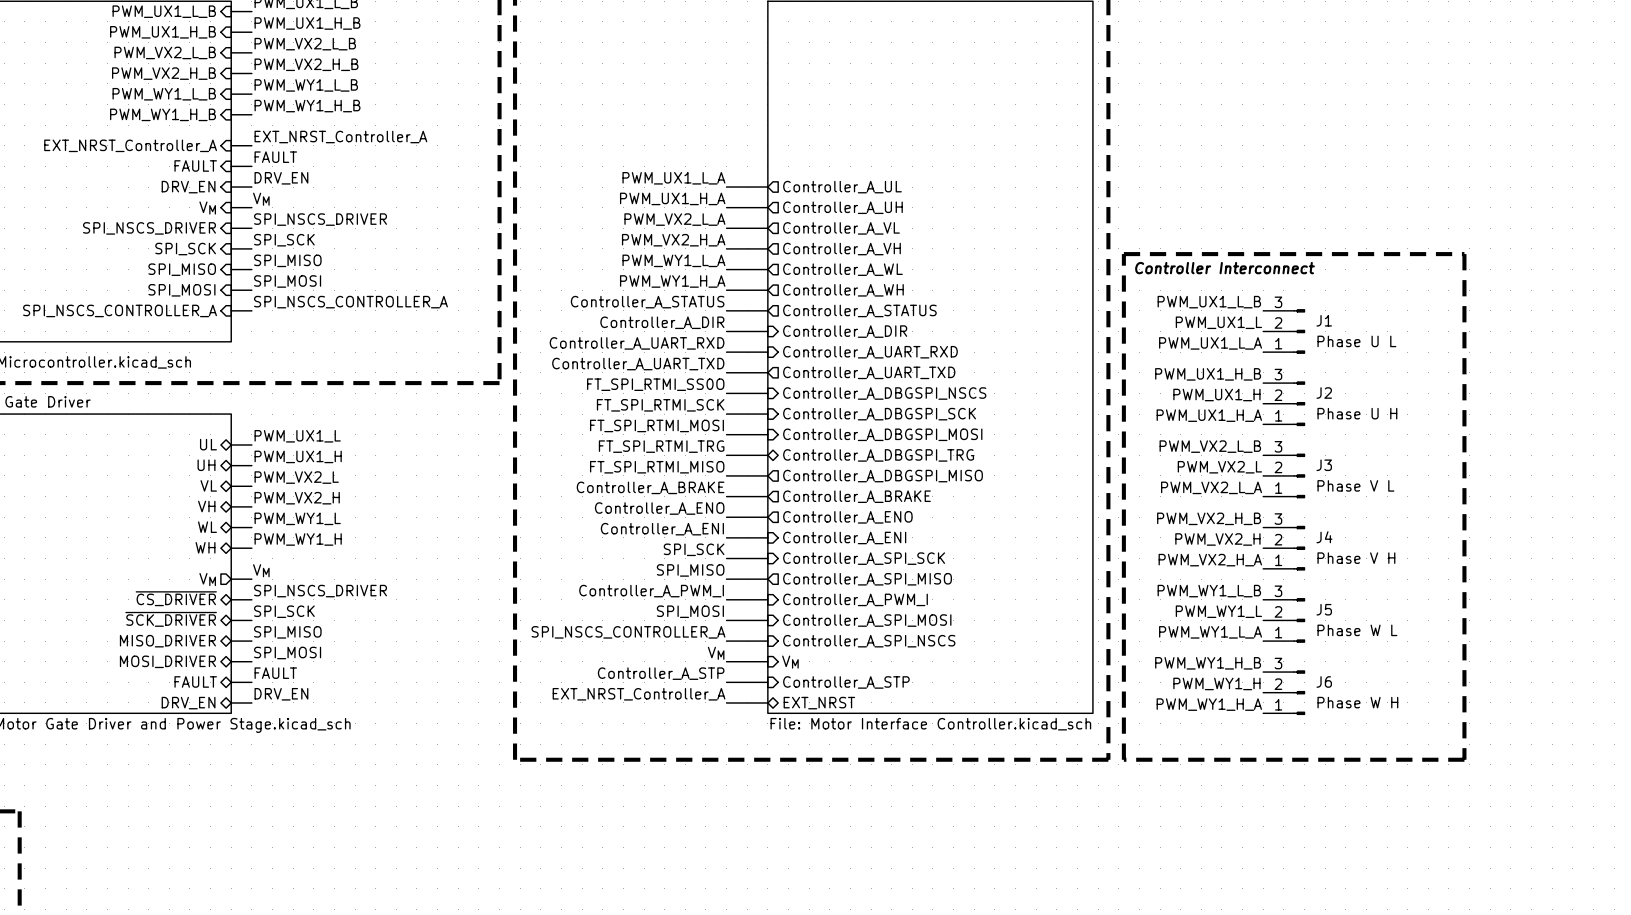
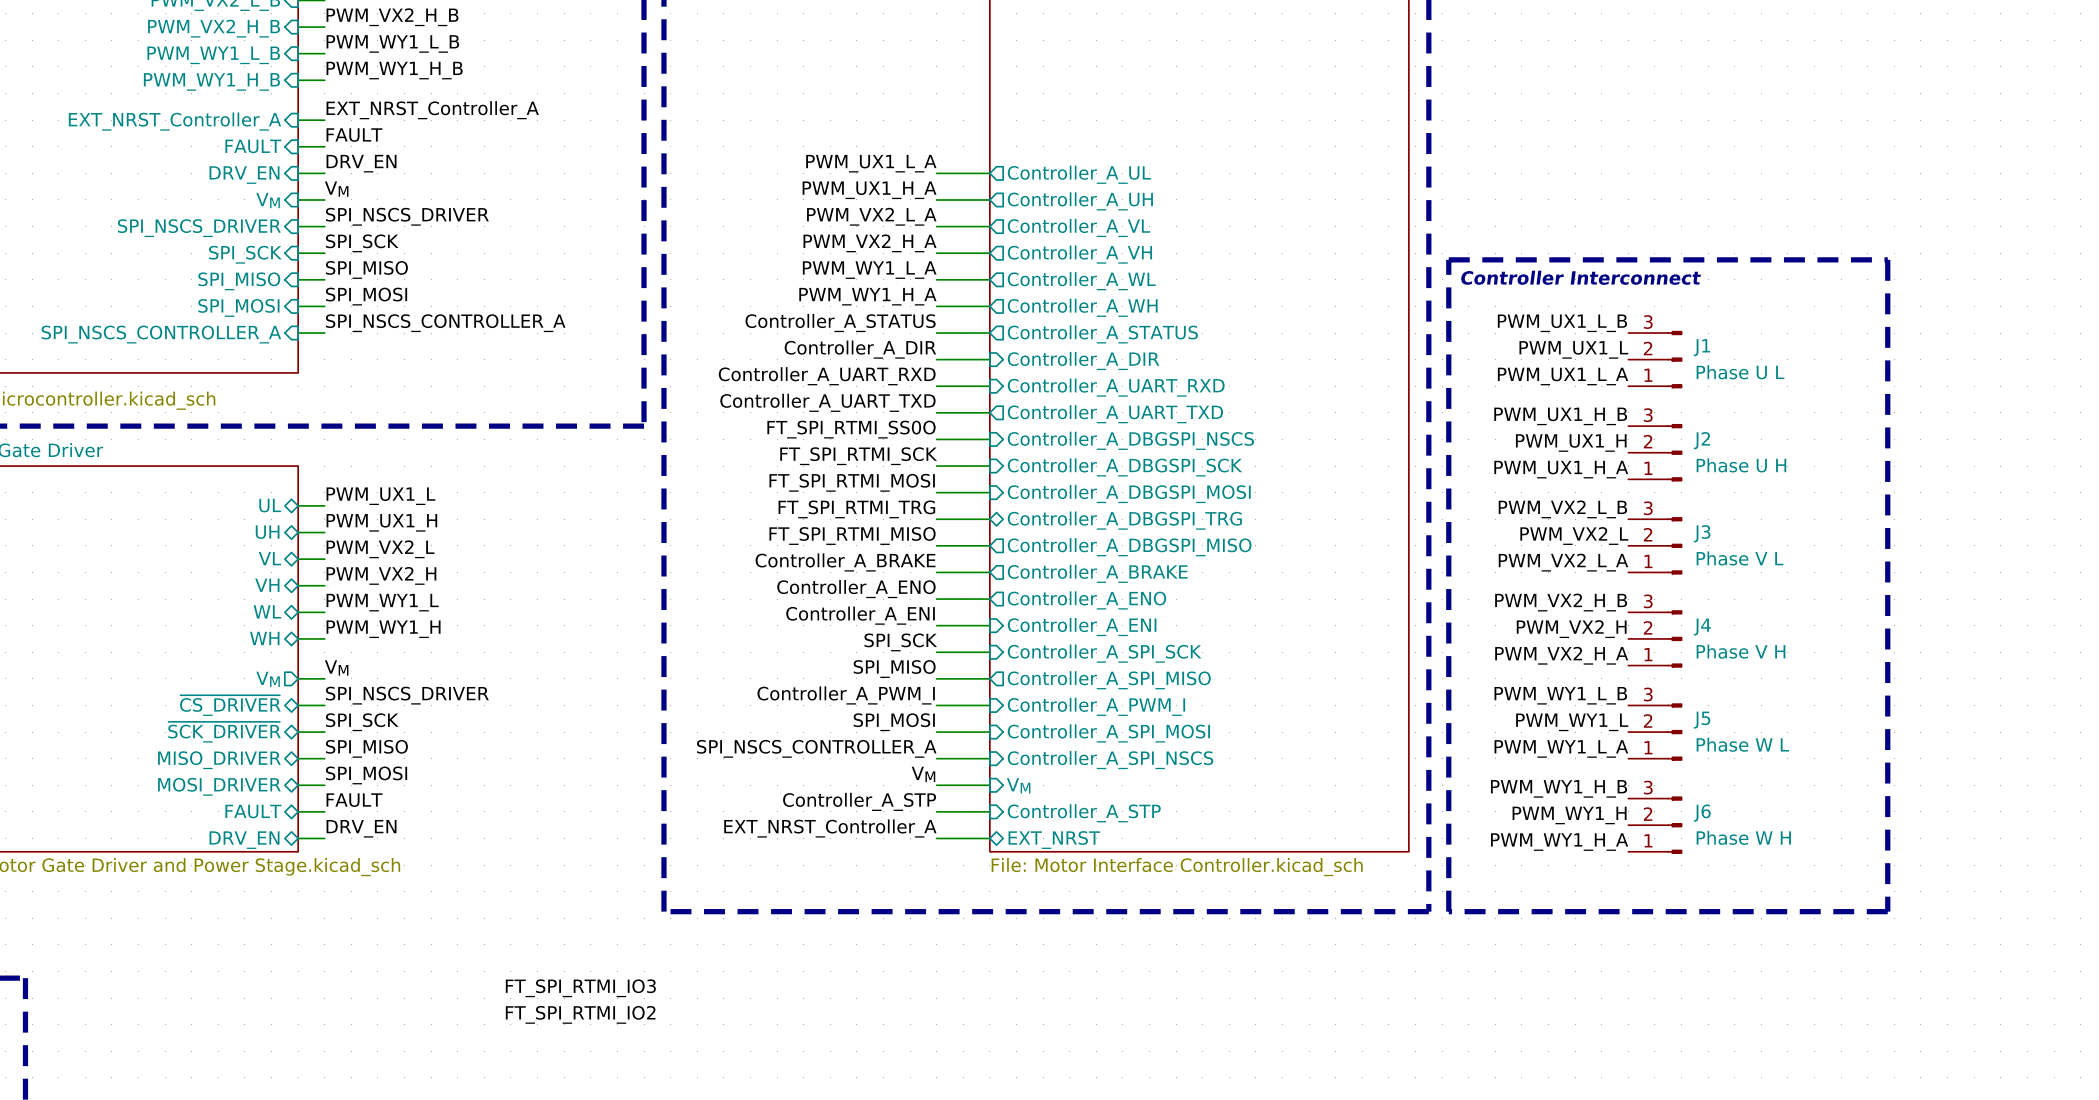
label: none -> FT_SPI_RTMI_IO3 (580, 988)
label: none -> FT_SPI_RTMI_IO2 (580, 1014)

